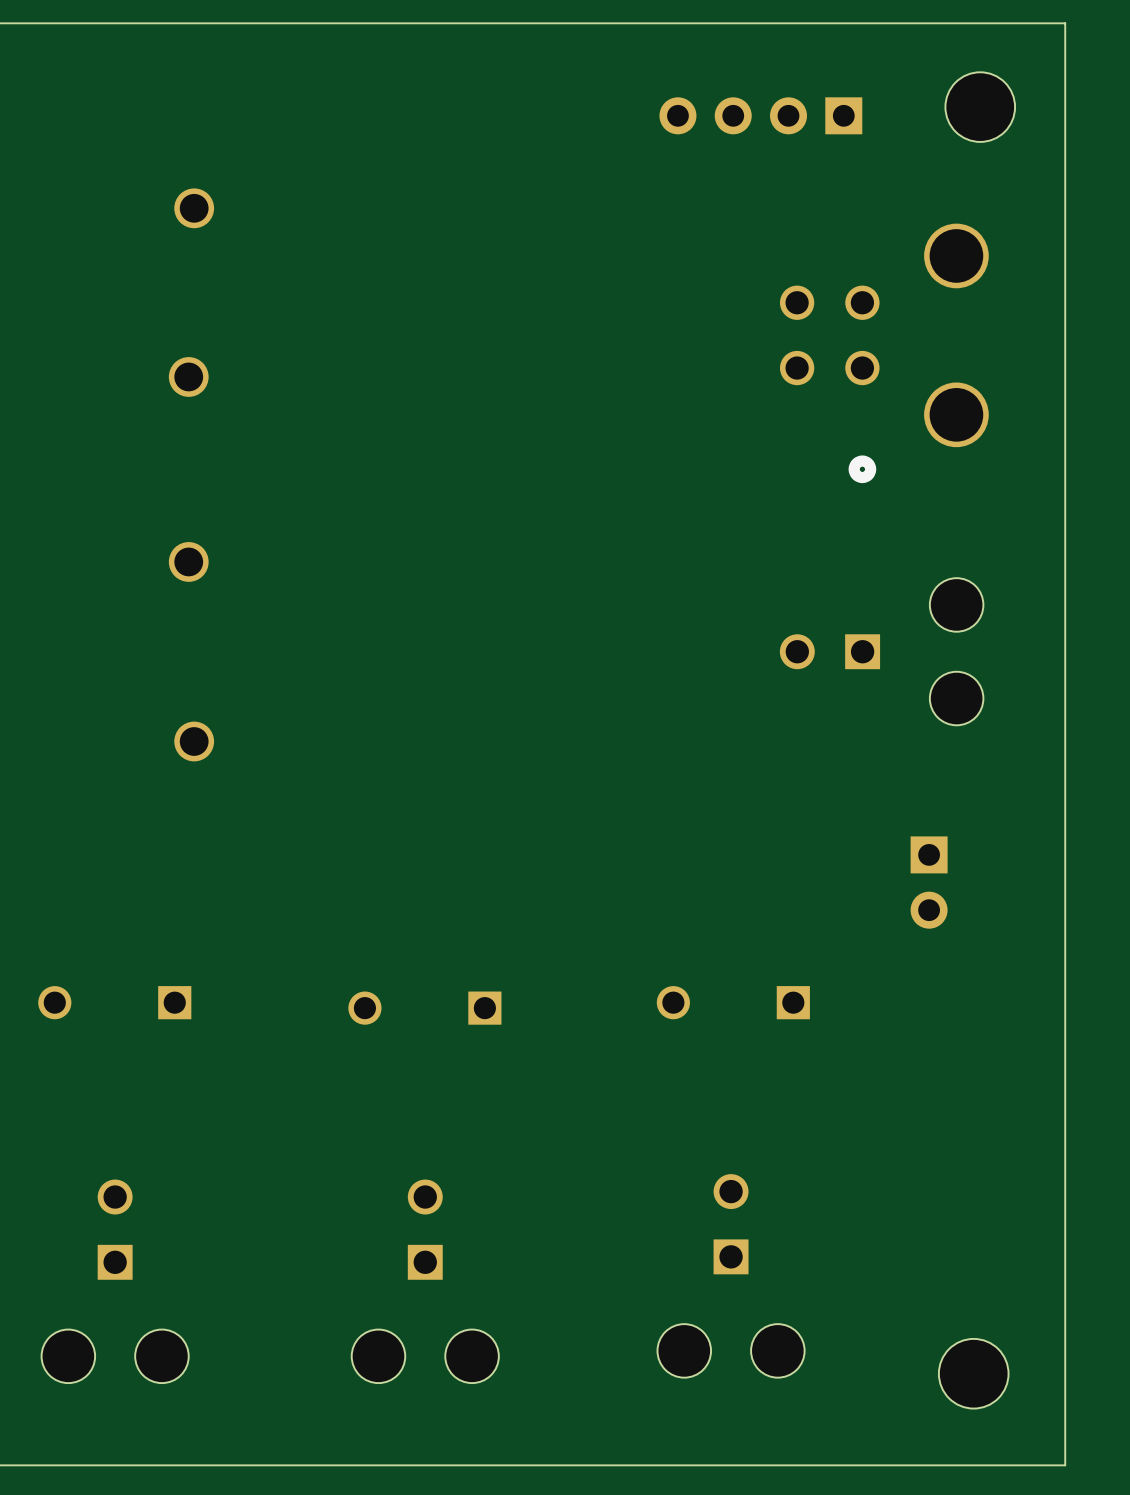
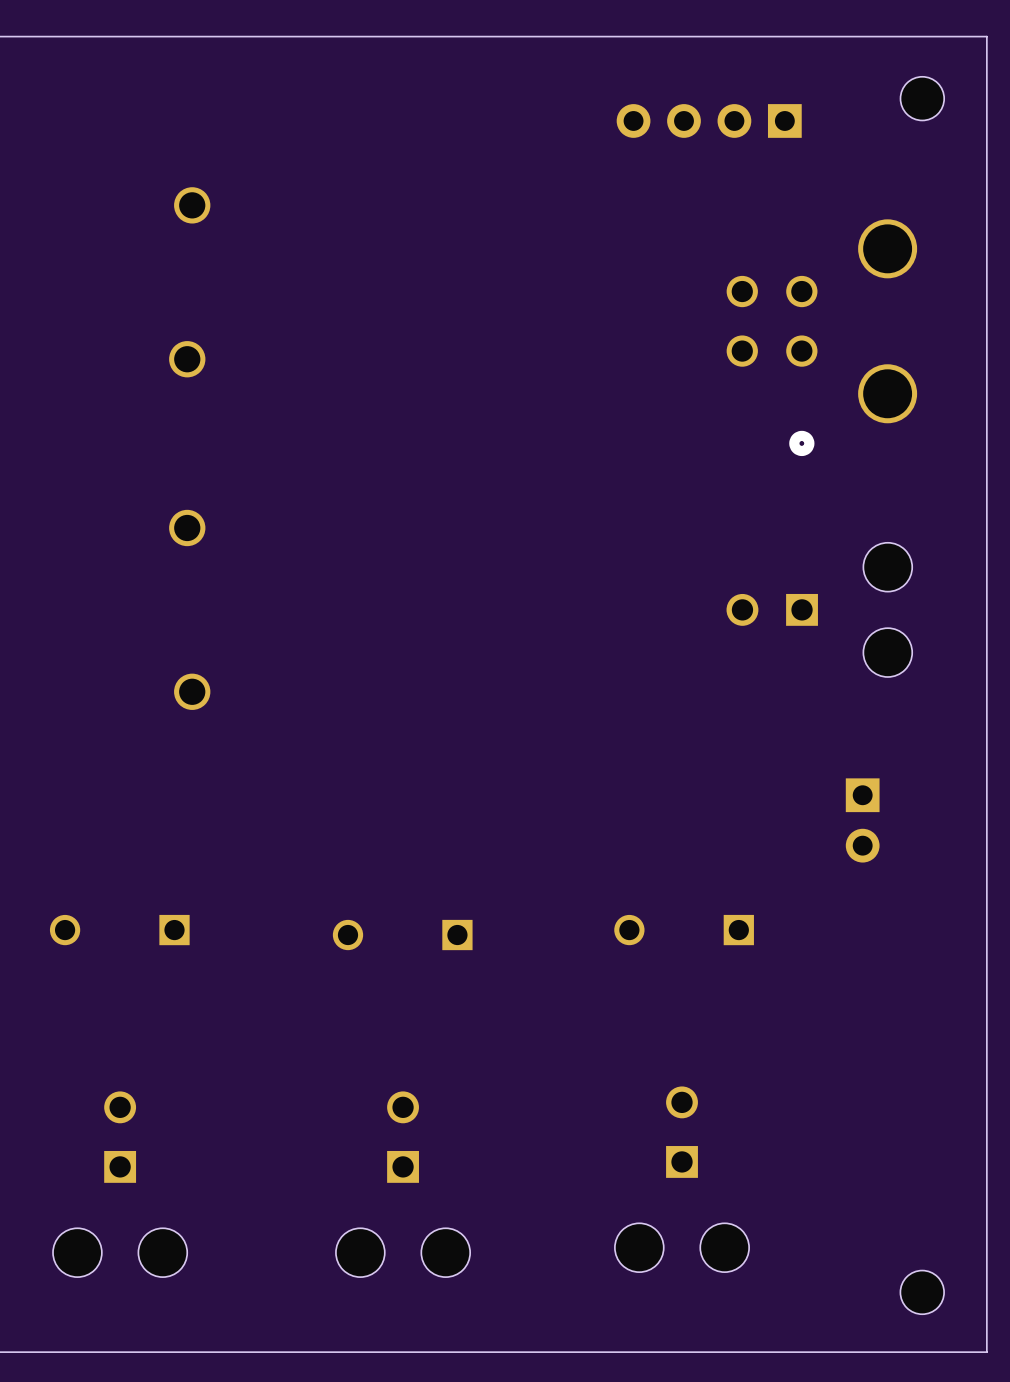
part footprint: [945, 72, 1016, 142] -> [900, 76, 945, 121]
part: (973, 1373) -> none
part: none -> (922, 1292)

